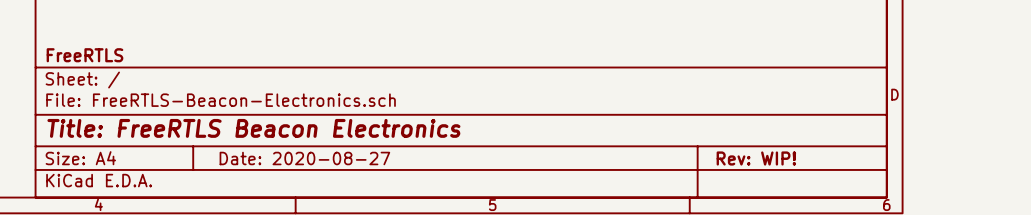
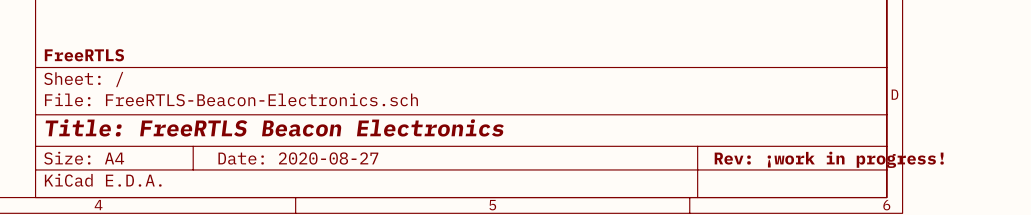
title block: Rev: WIP! (756, 158) -> Rev: ¡work in progress! (829, 159)

